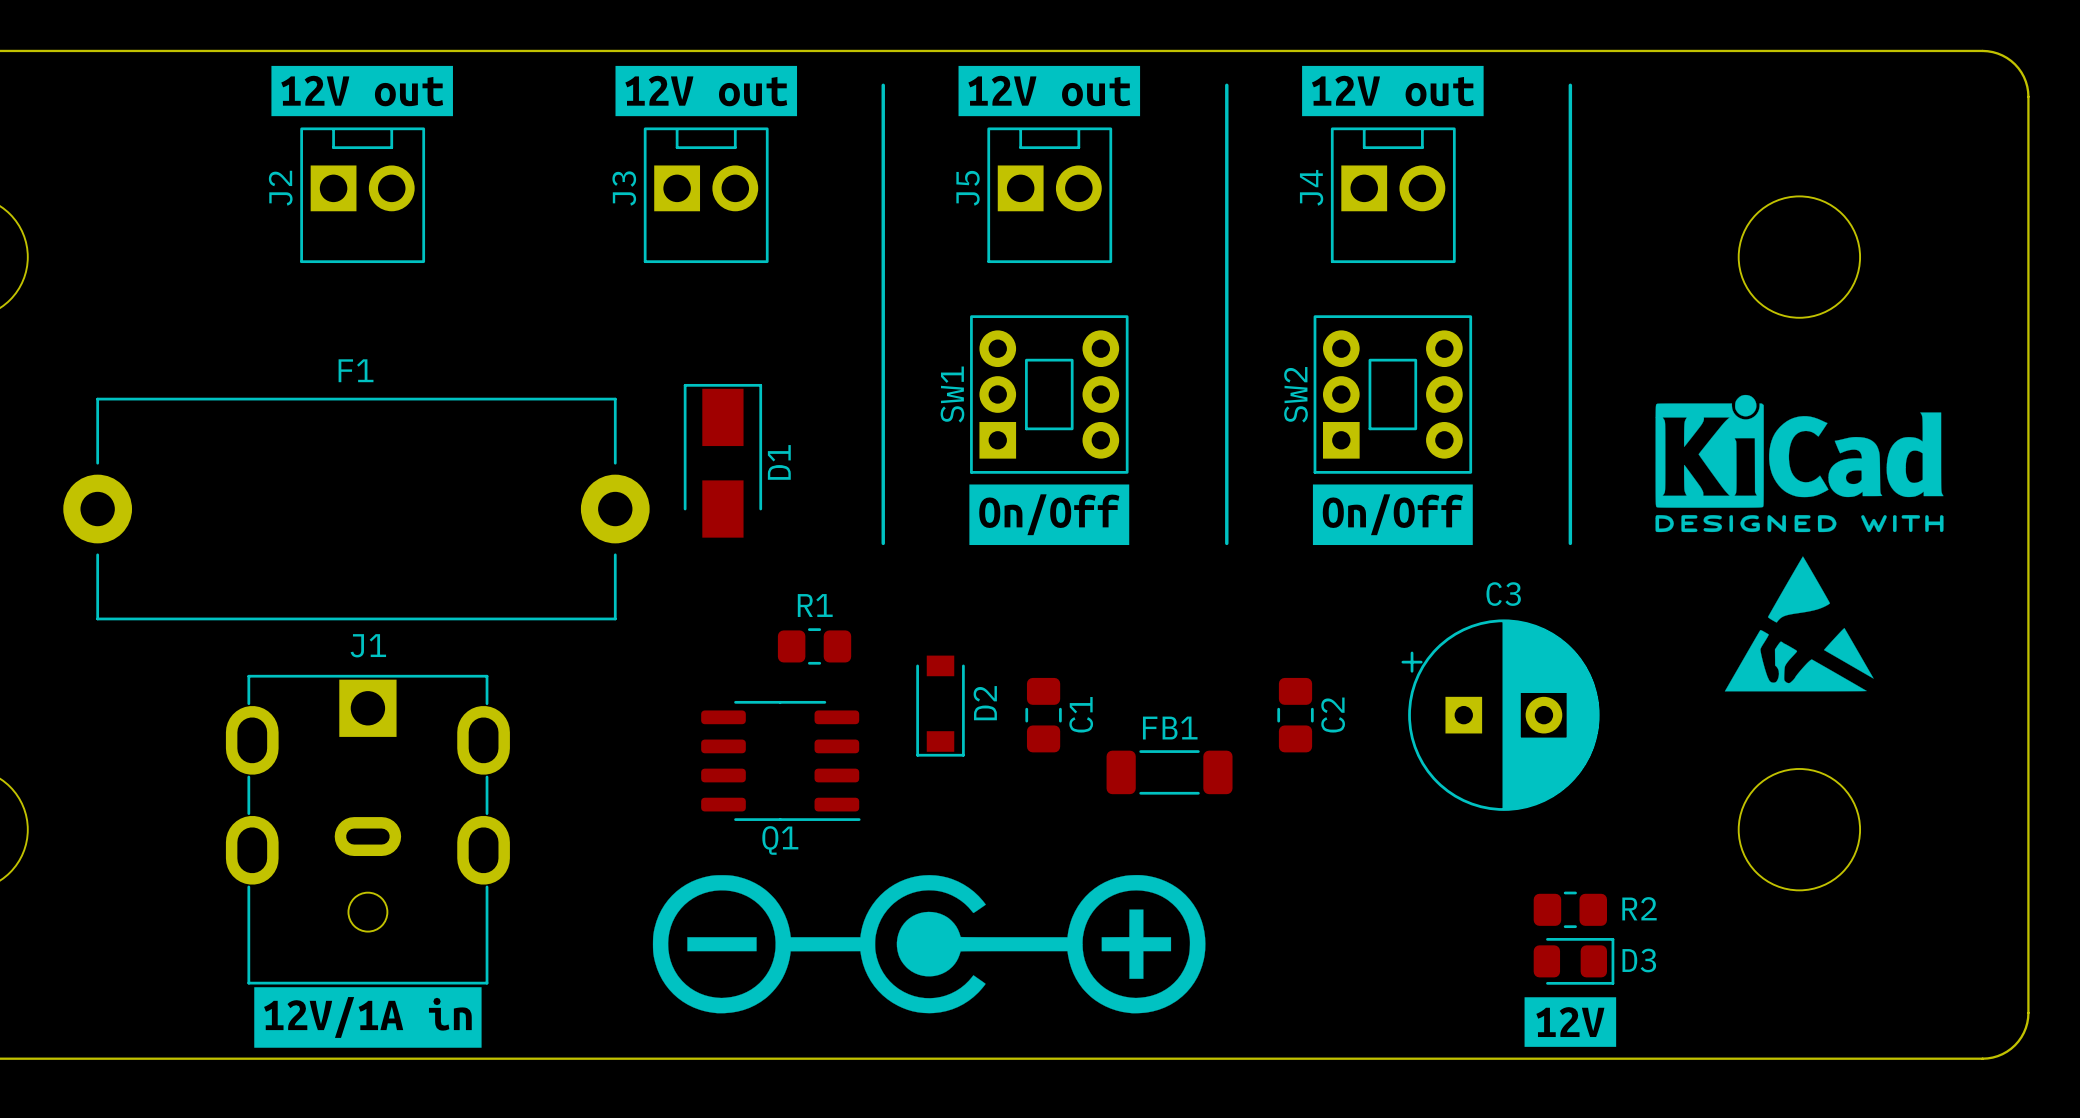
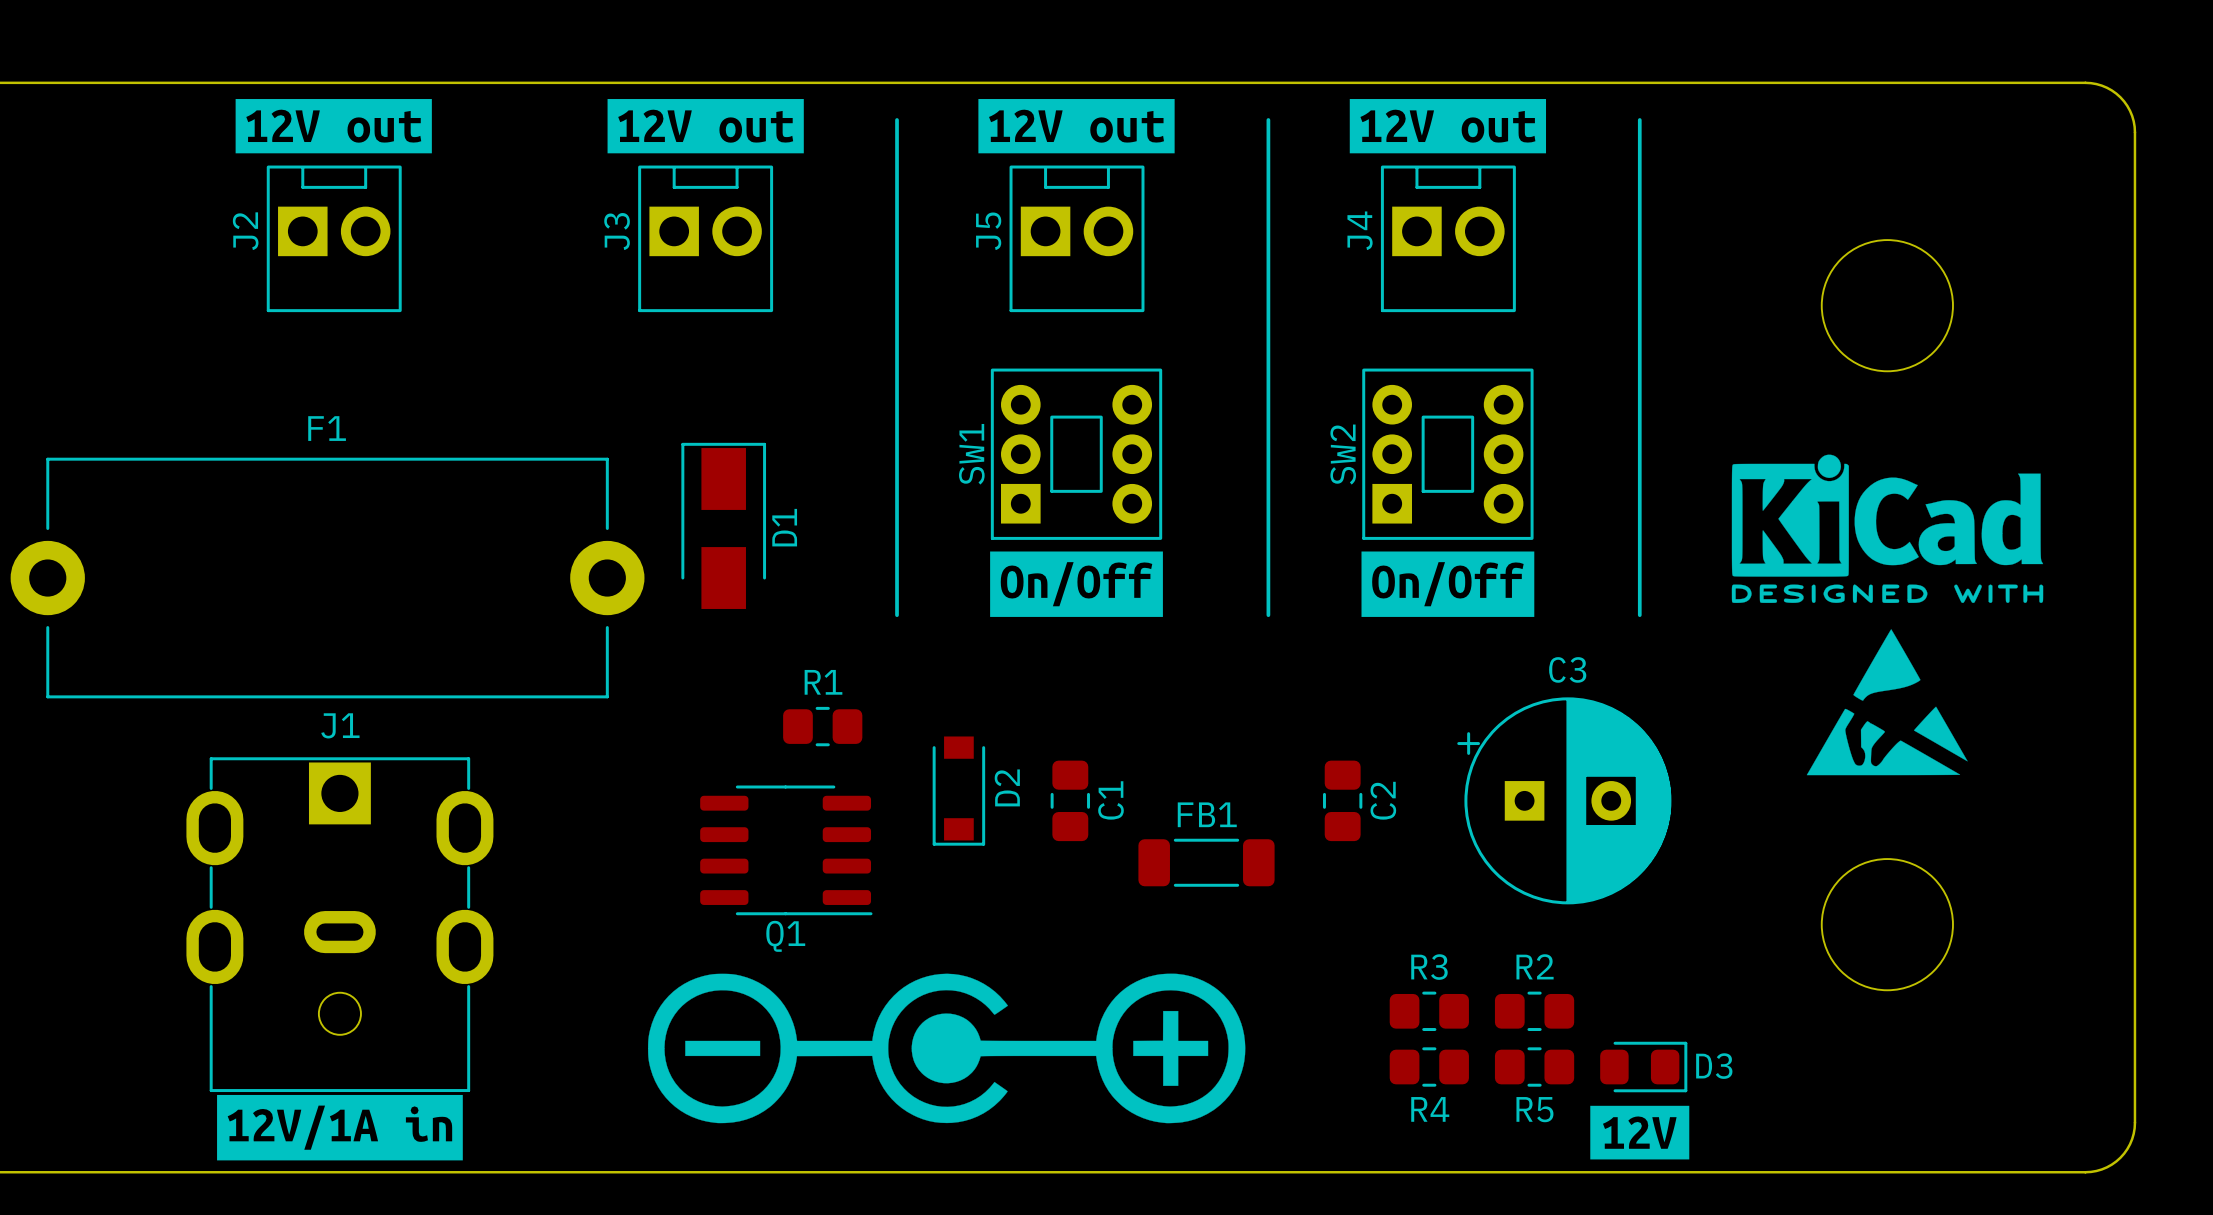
R2 name position: R2 (1639, 908) -> R2 (1535, 966)
R3: none -> (1429, 1011)
R2 position: (1570, 909) -> (1534, 1011)
R4: none -> (1429, 1067)
R5: none -> (1534, 1067)

